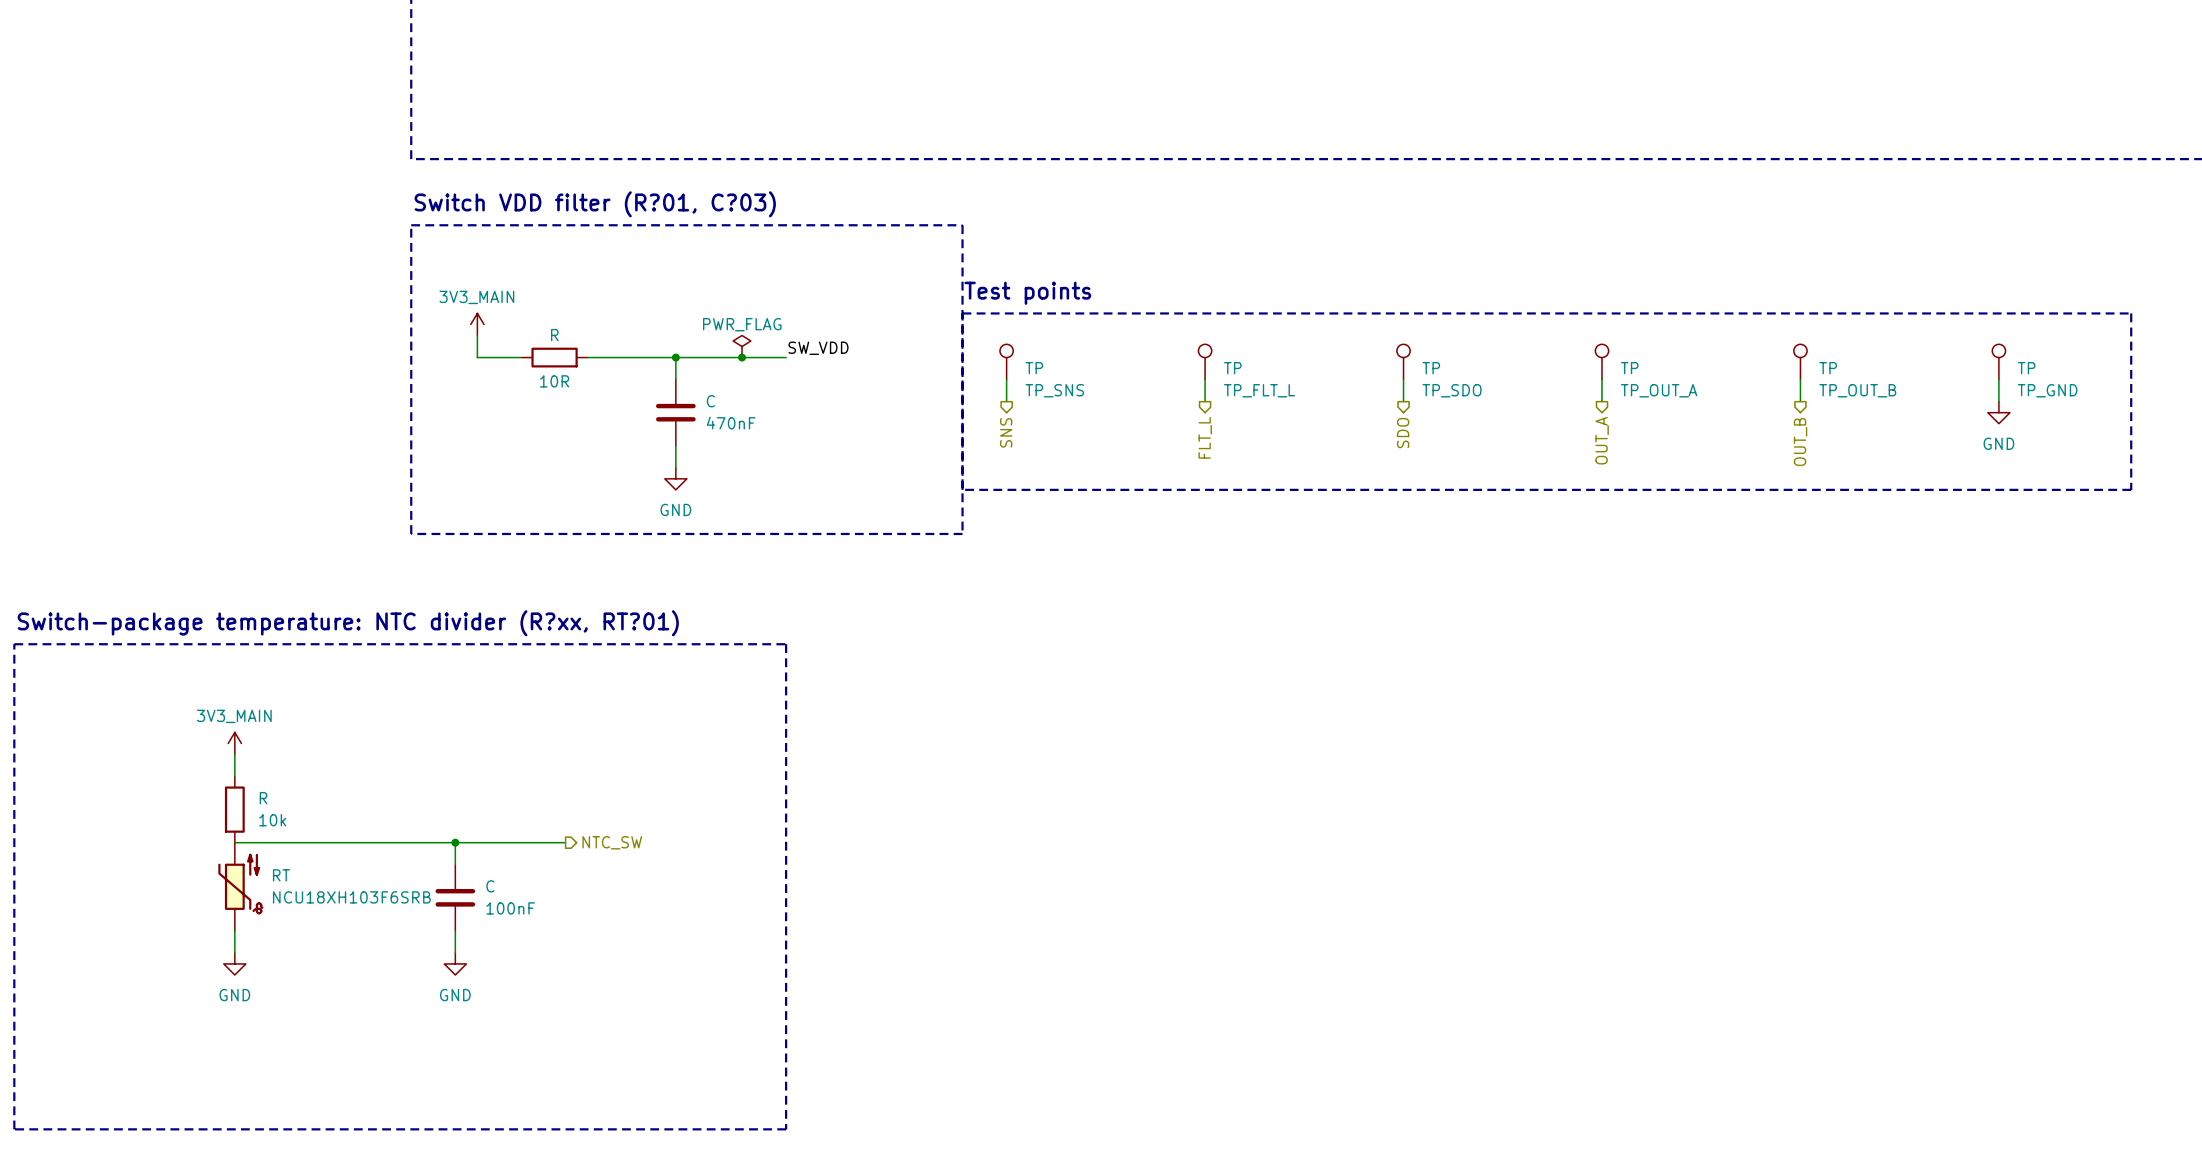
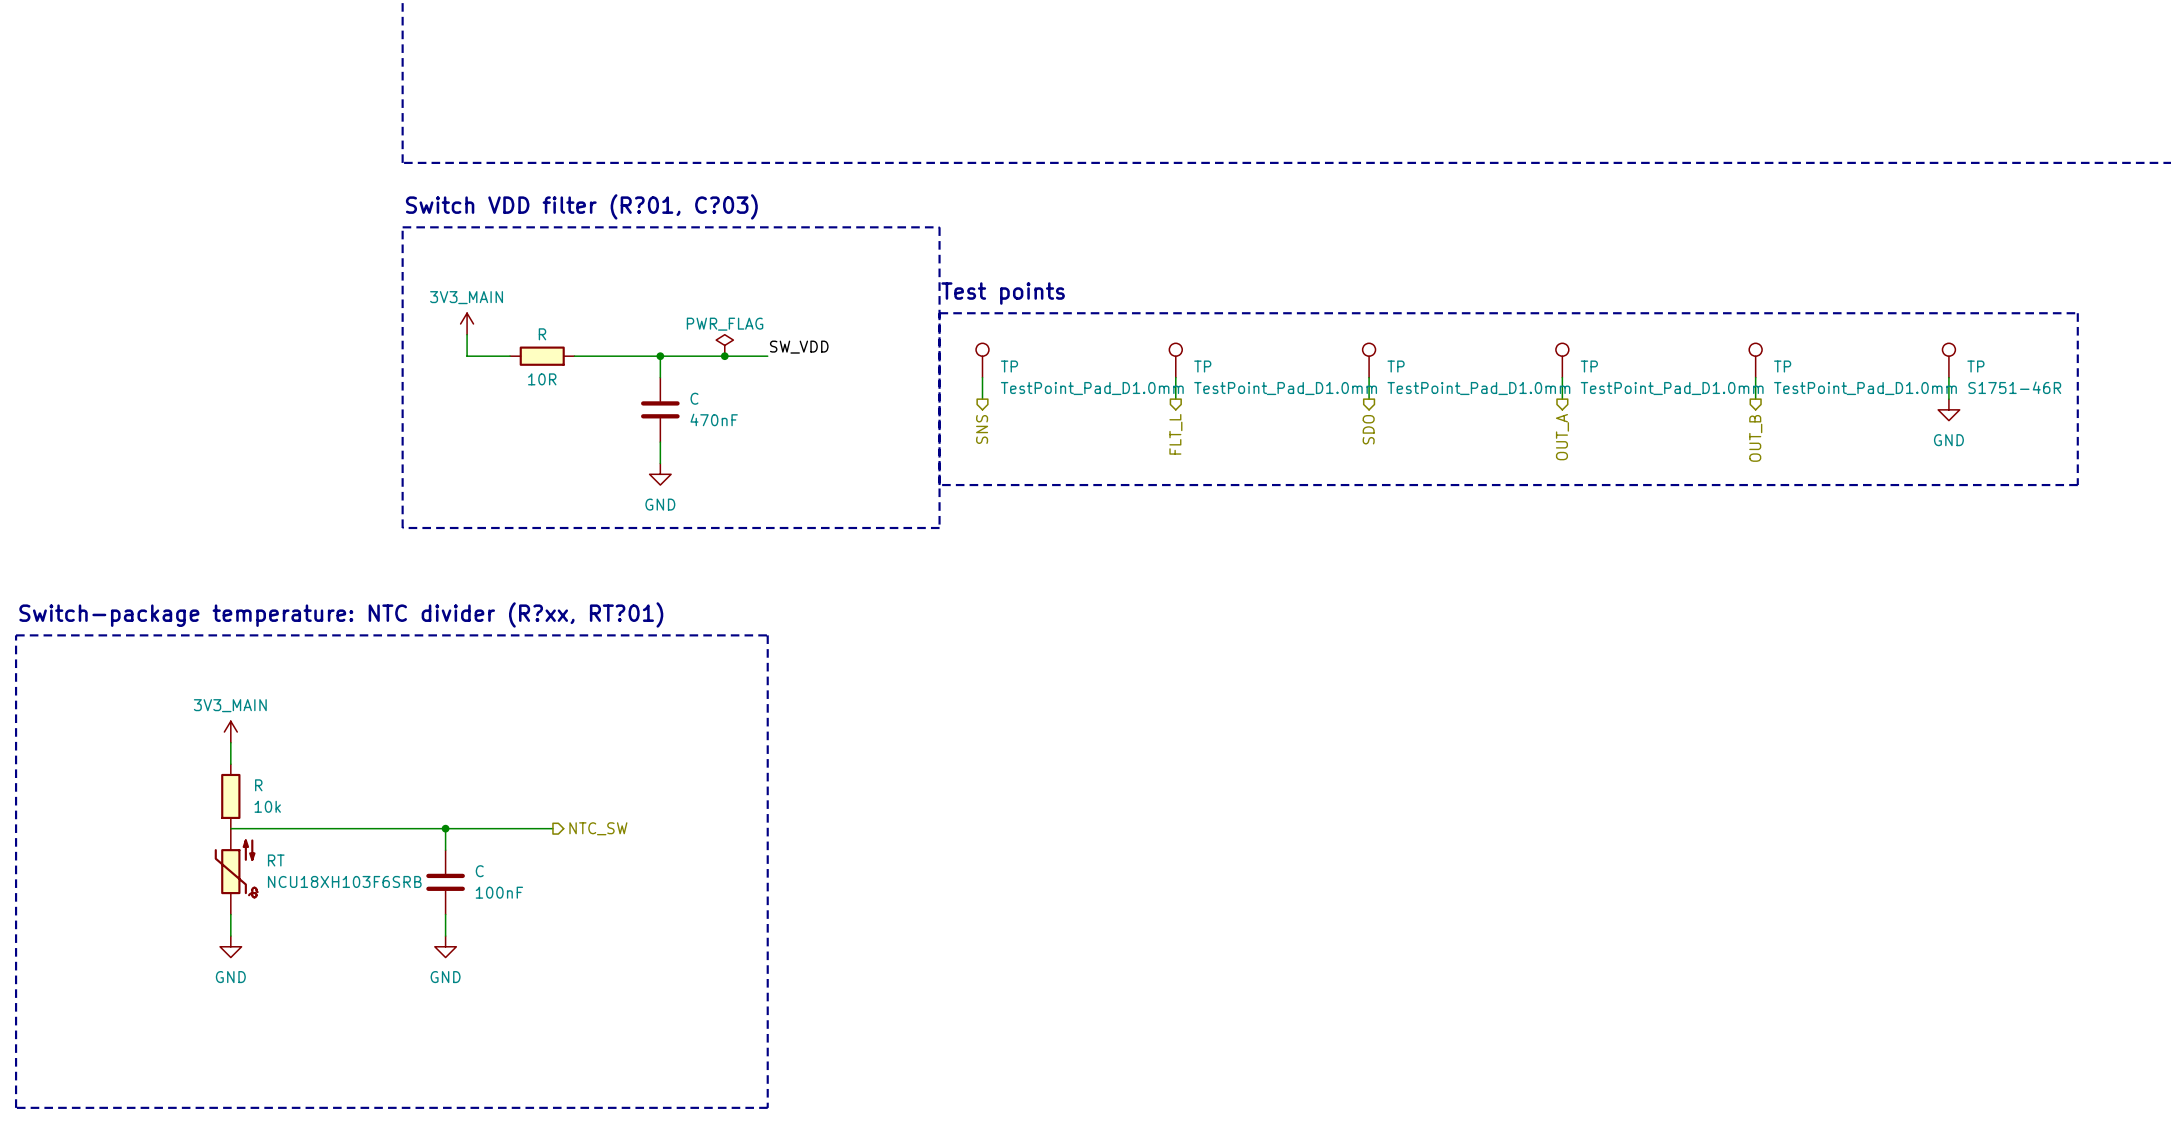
R symbol: [521, 347, 588, 368] -> [510, 346, 575, 366]
TP value: TP_SNS (1054, 390) -> TestPoint_Pad_D1.0mm (1092, 388)
TP value: TP_FLT_L (1259, 390) -> TestPoint_Pad_D1.0mm (1285, 388)
TP value: TP_SDO (1451, 390) -> TestPoint_Pad_D1.0mm (1478, 388)
TP value: TP_OUT_A (1659, 390) -> TestPoint_Pad_D1.0mm (1672, 388)
TP value: TP_OUT_B (1857, 390) -> TestPoint_Pad_D1.0mm (1865, 388)
TP value: TP_GND (2047, 390) -> S1751-46R (2014, 387)
R symbol: [224, 776, 245, 843] -> [221, 764, 241, 829]

